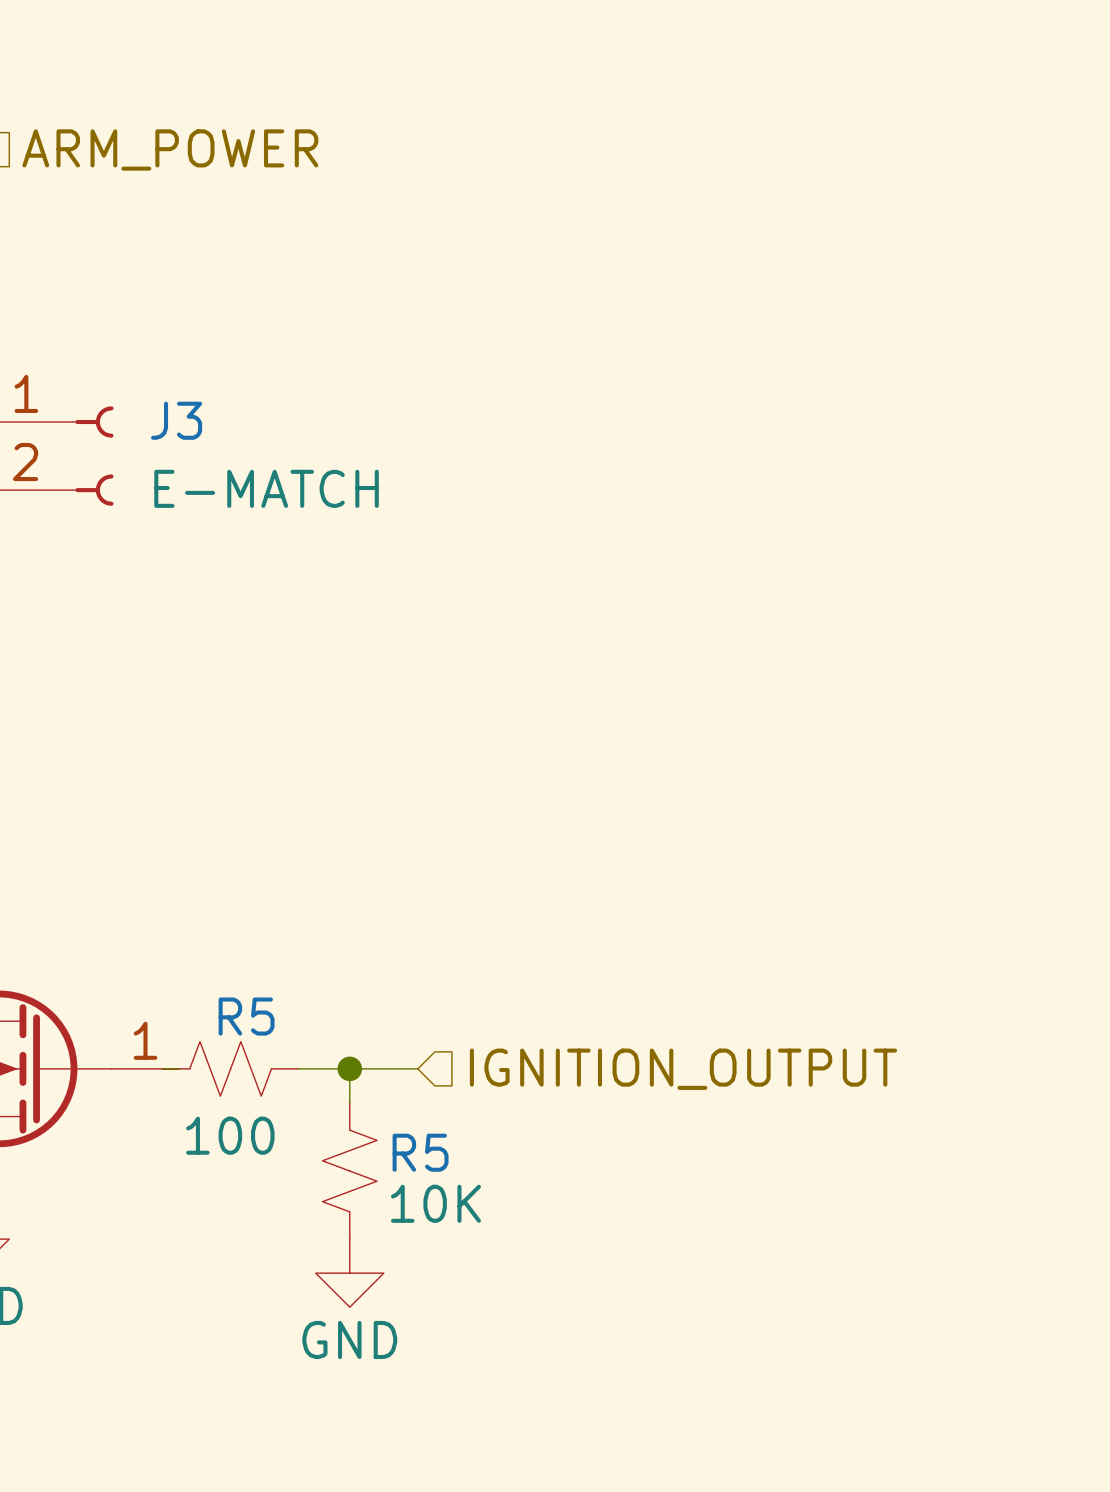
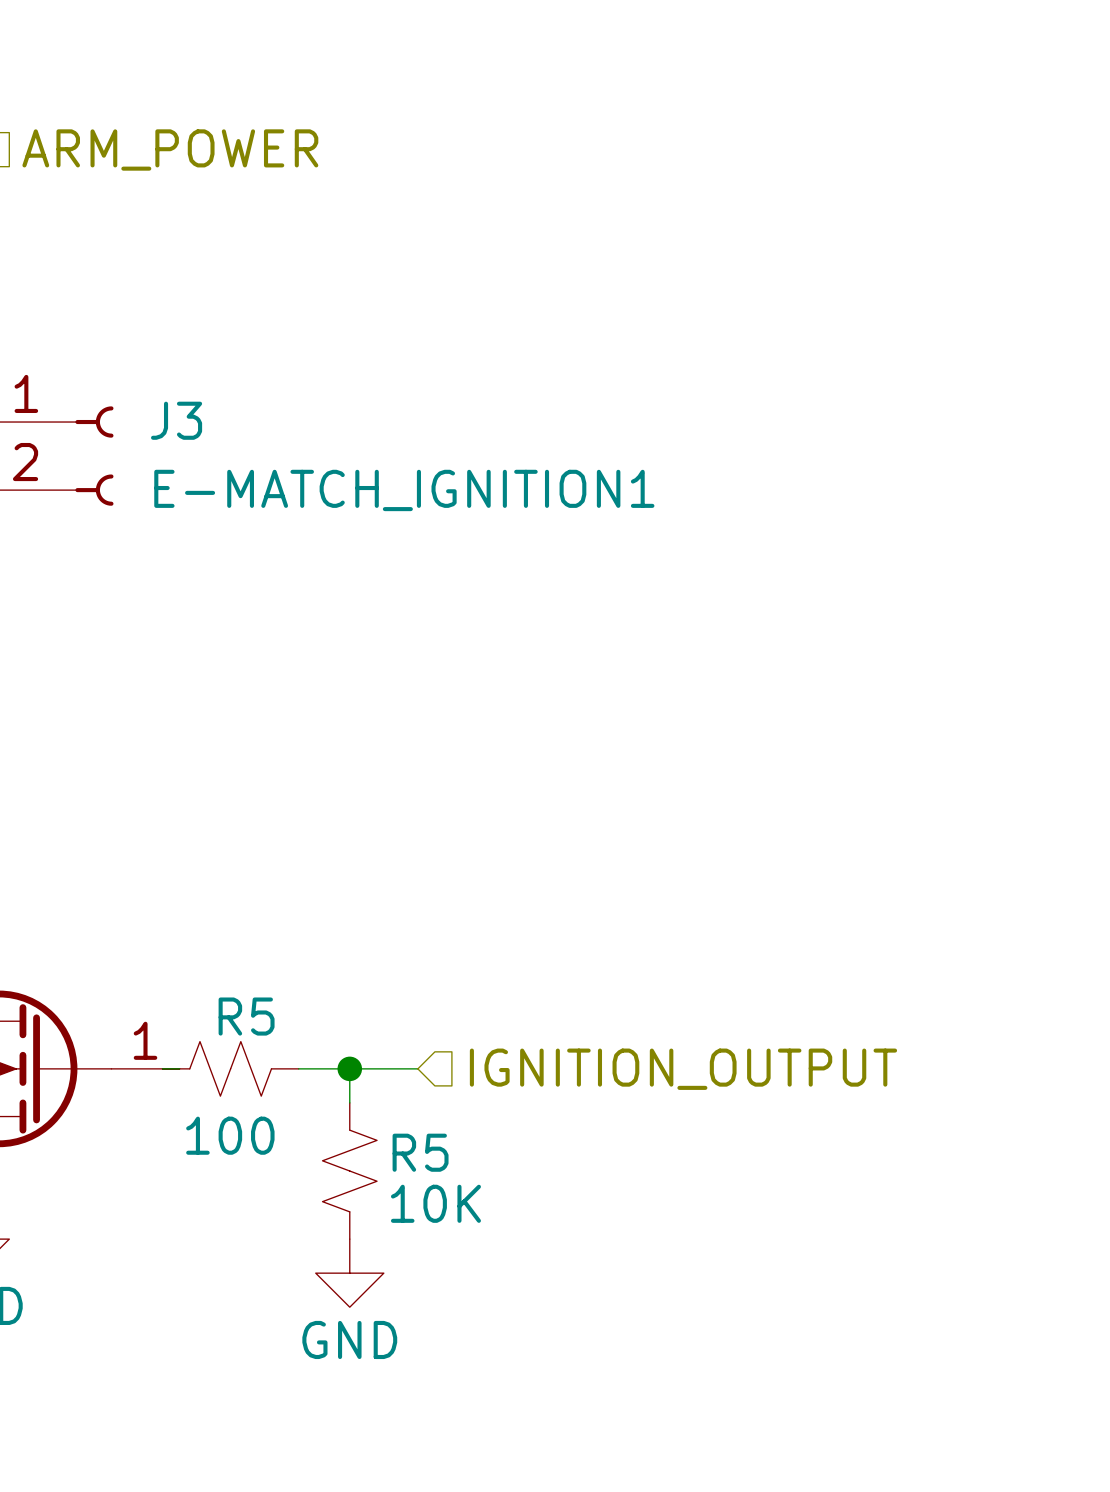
J3 value: E-MATCH (266, 488) -> E-MATCH_IGNITION1 (404, 490)

